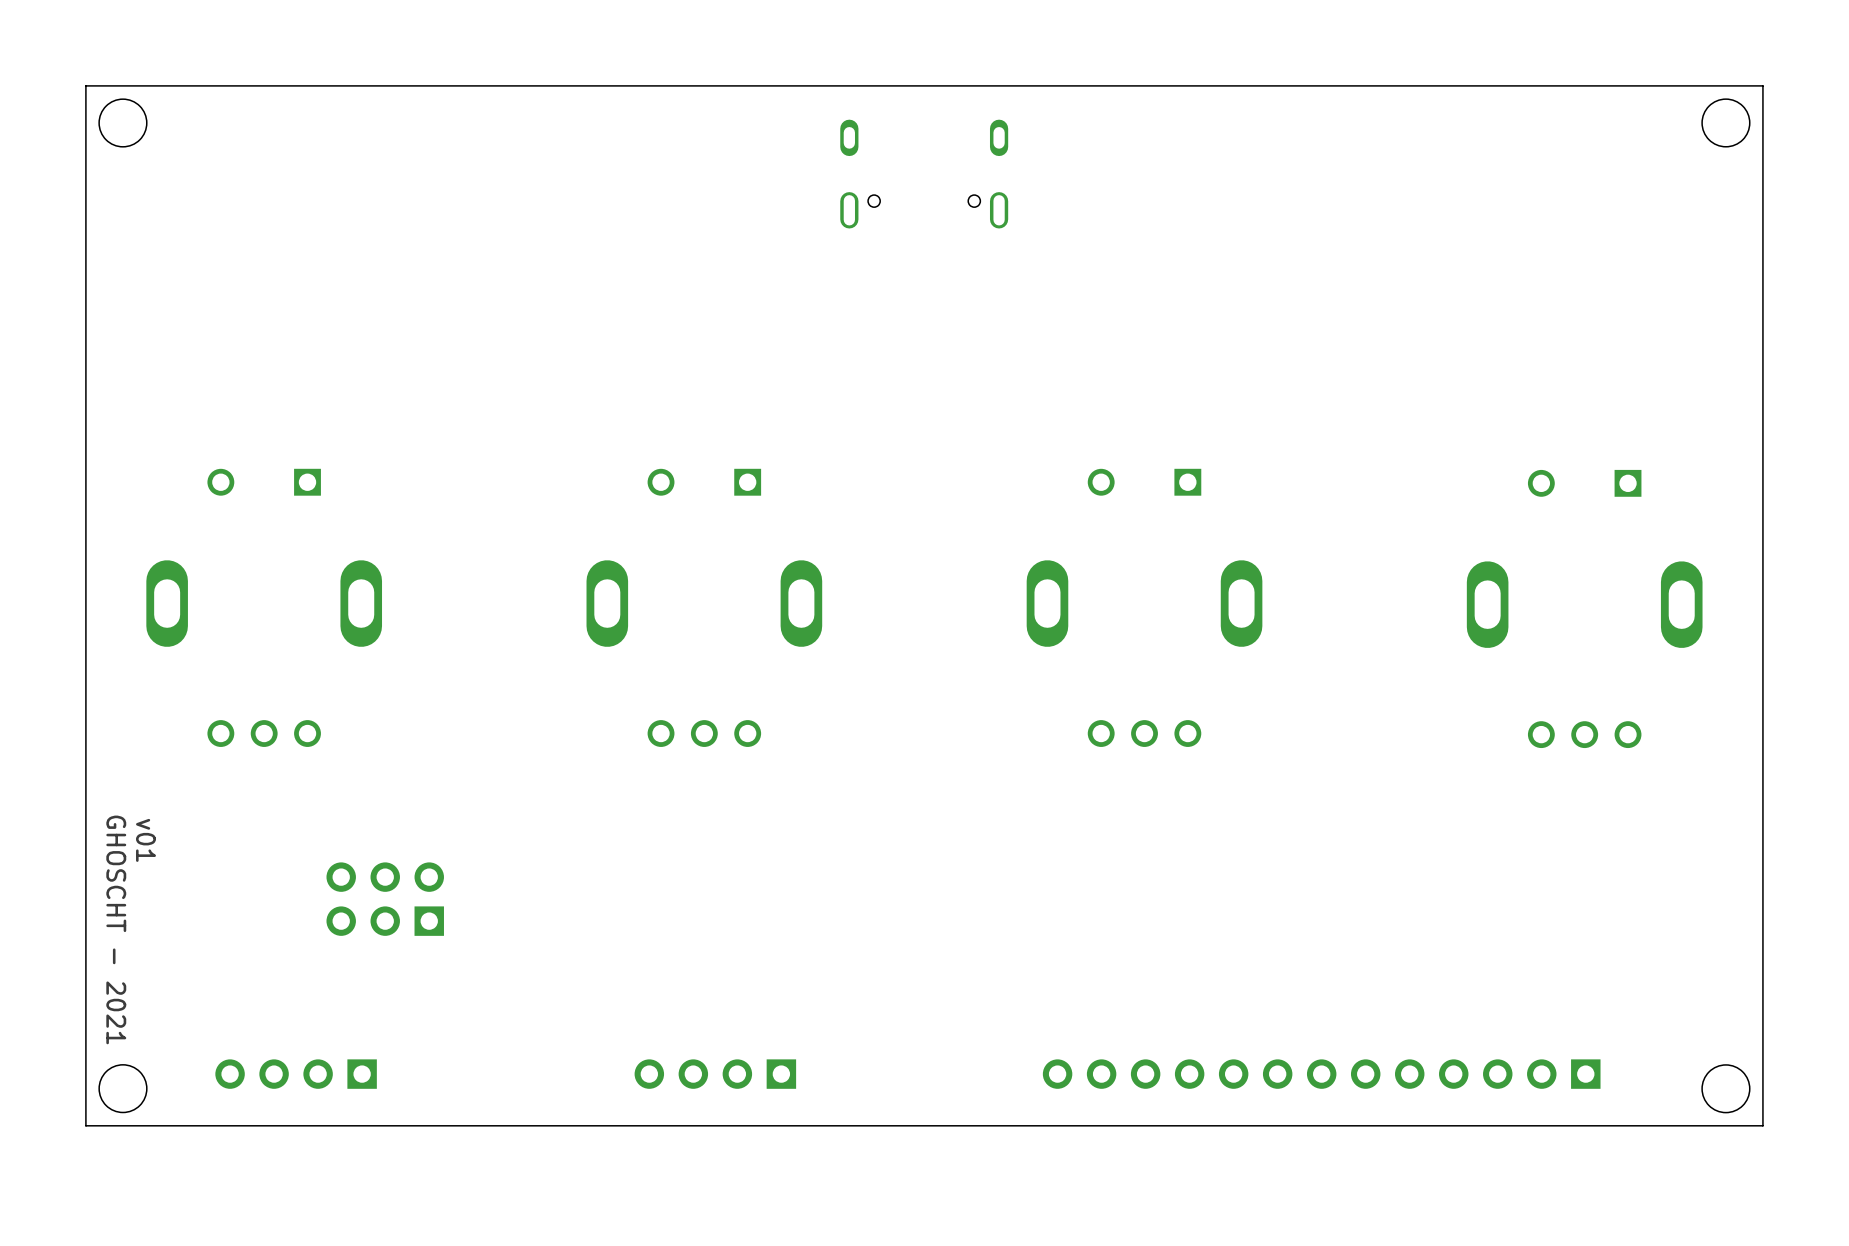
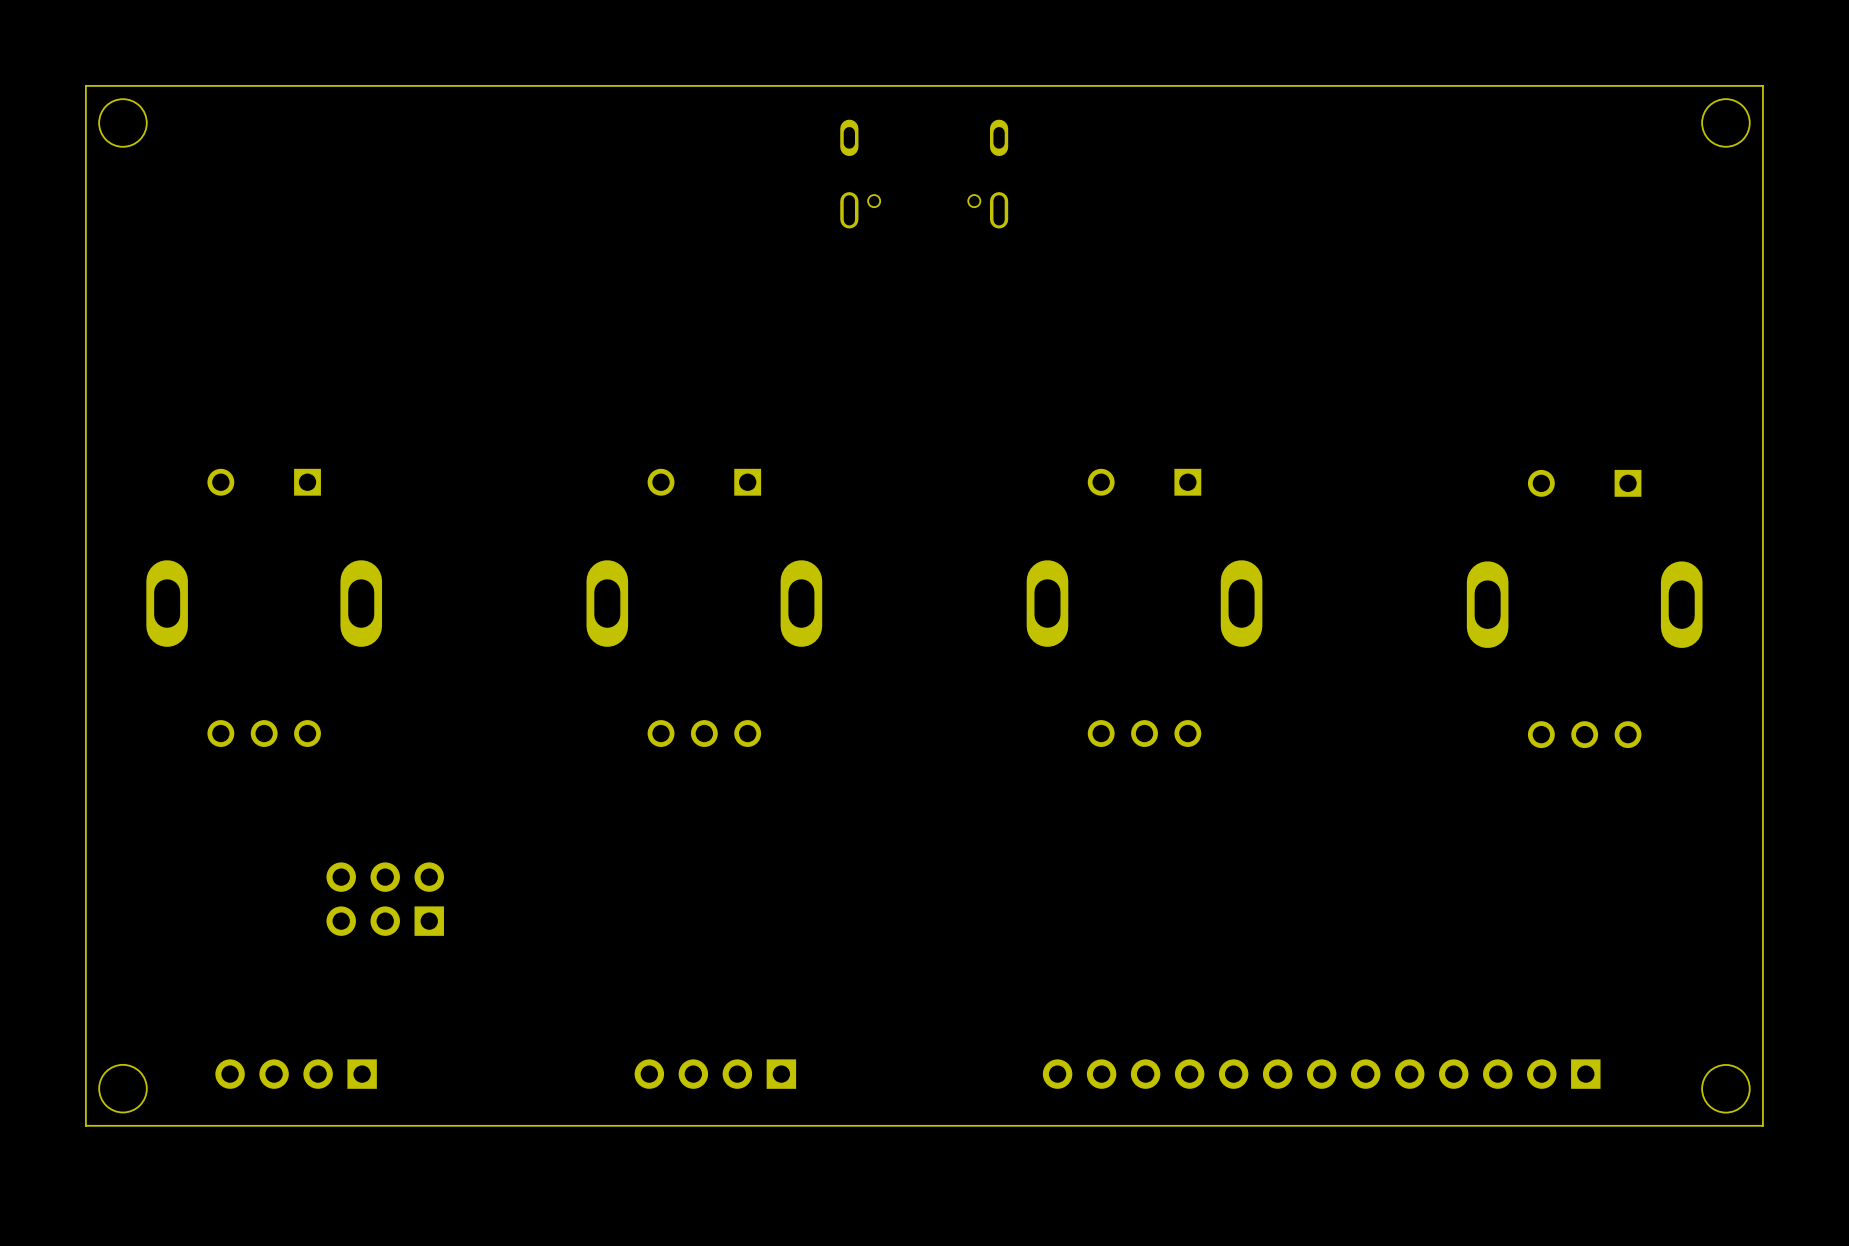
text: v01 (145, 840) -> none
text: GHOSCHT - 2021 (116, 929) -> none

